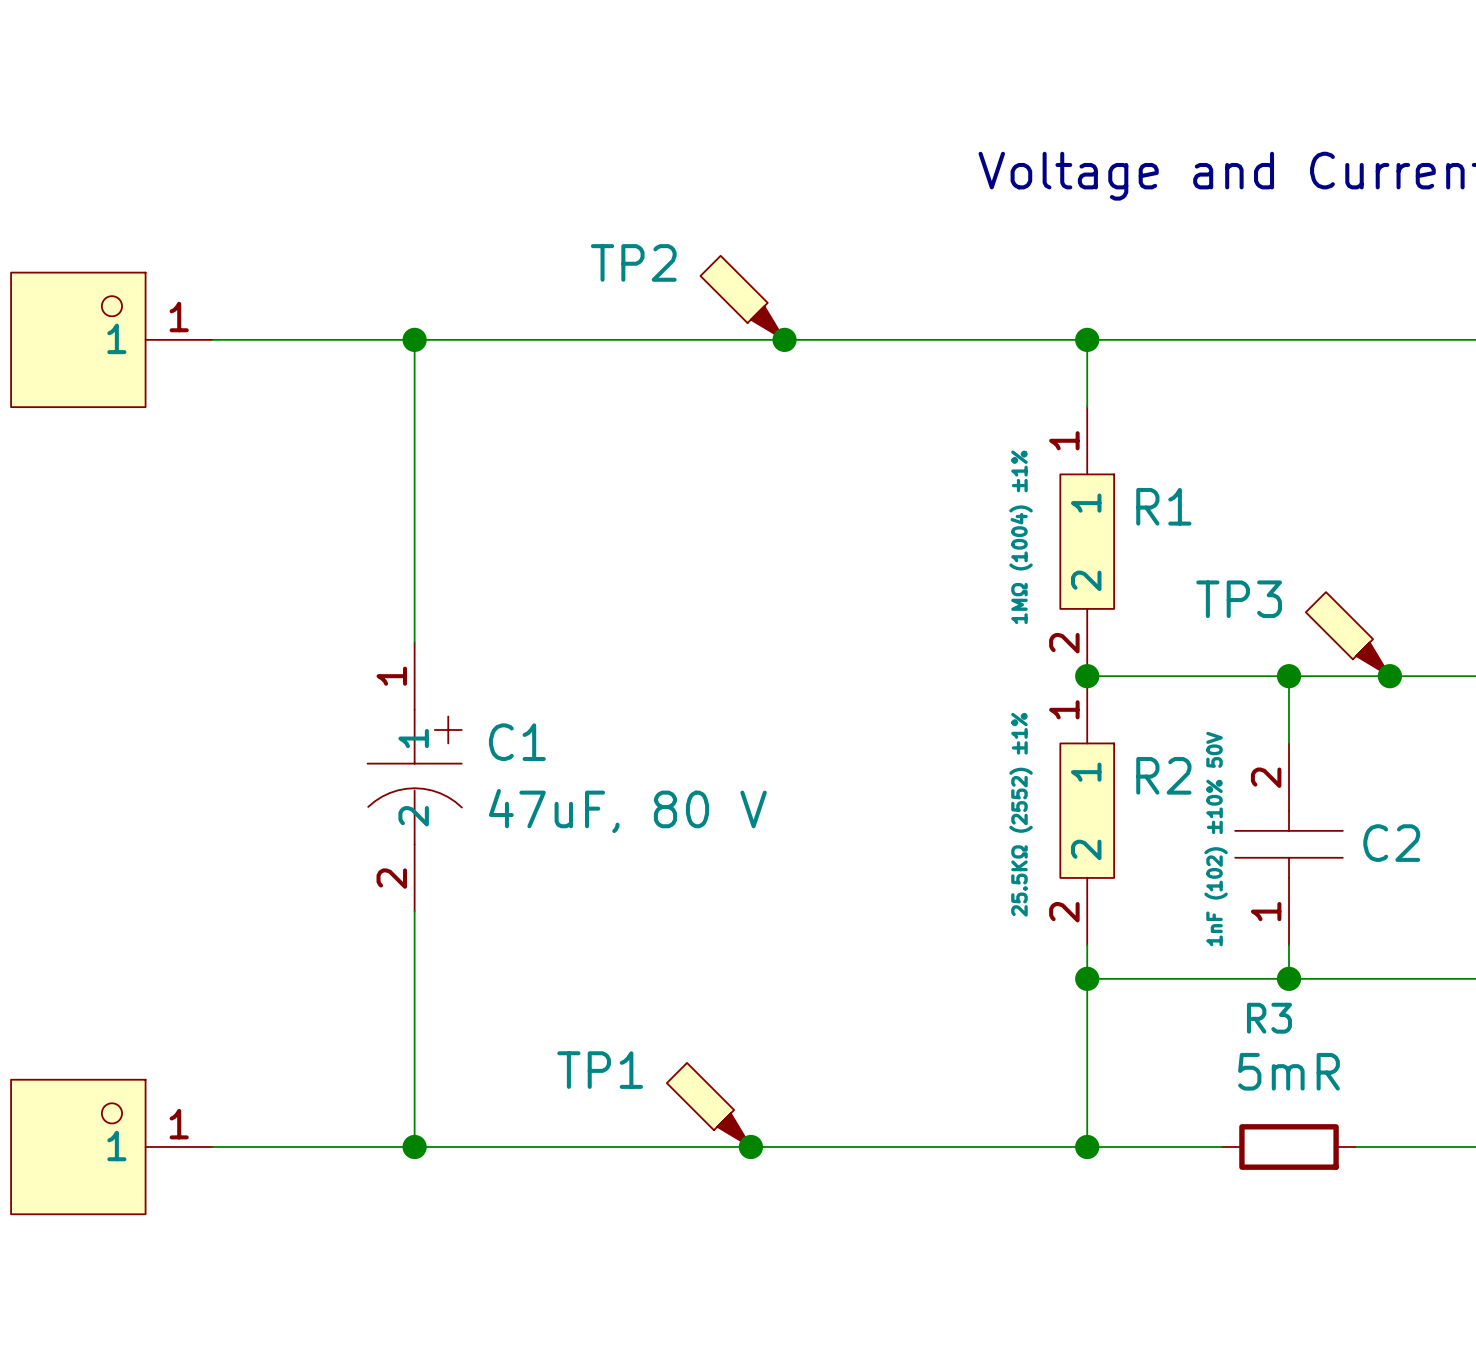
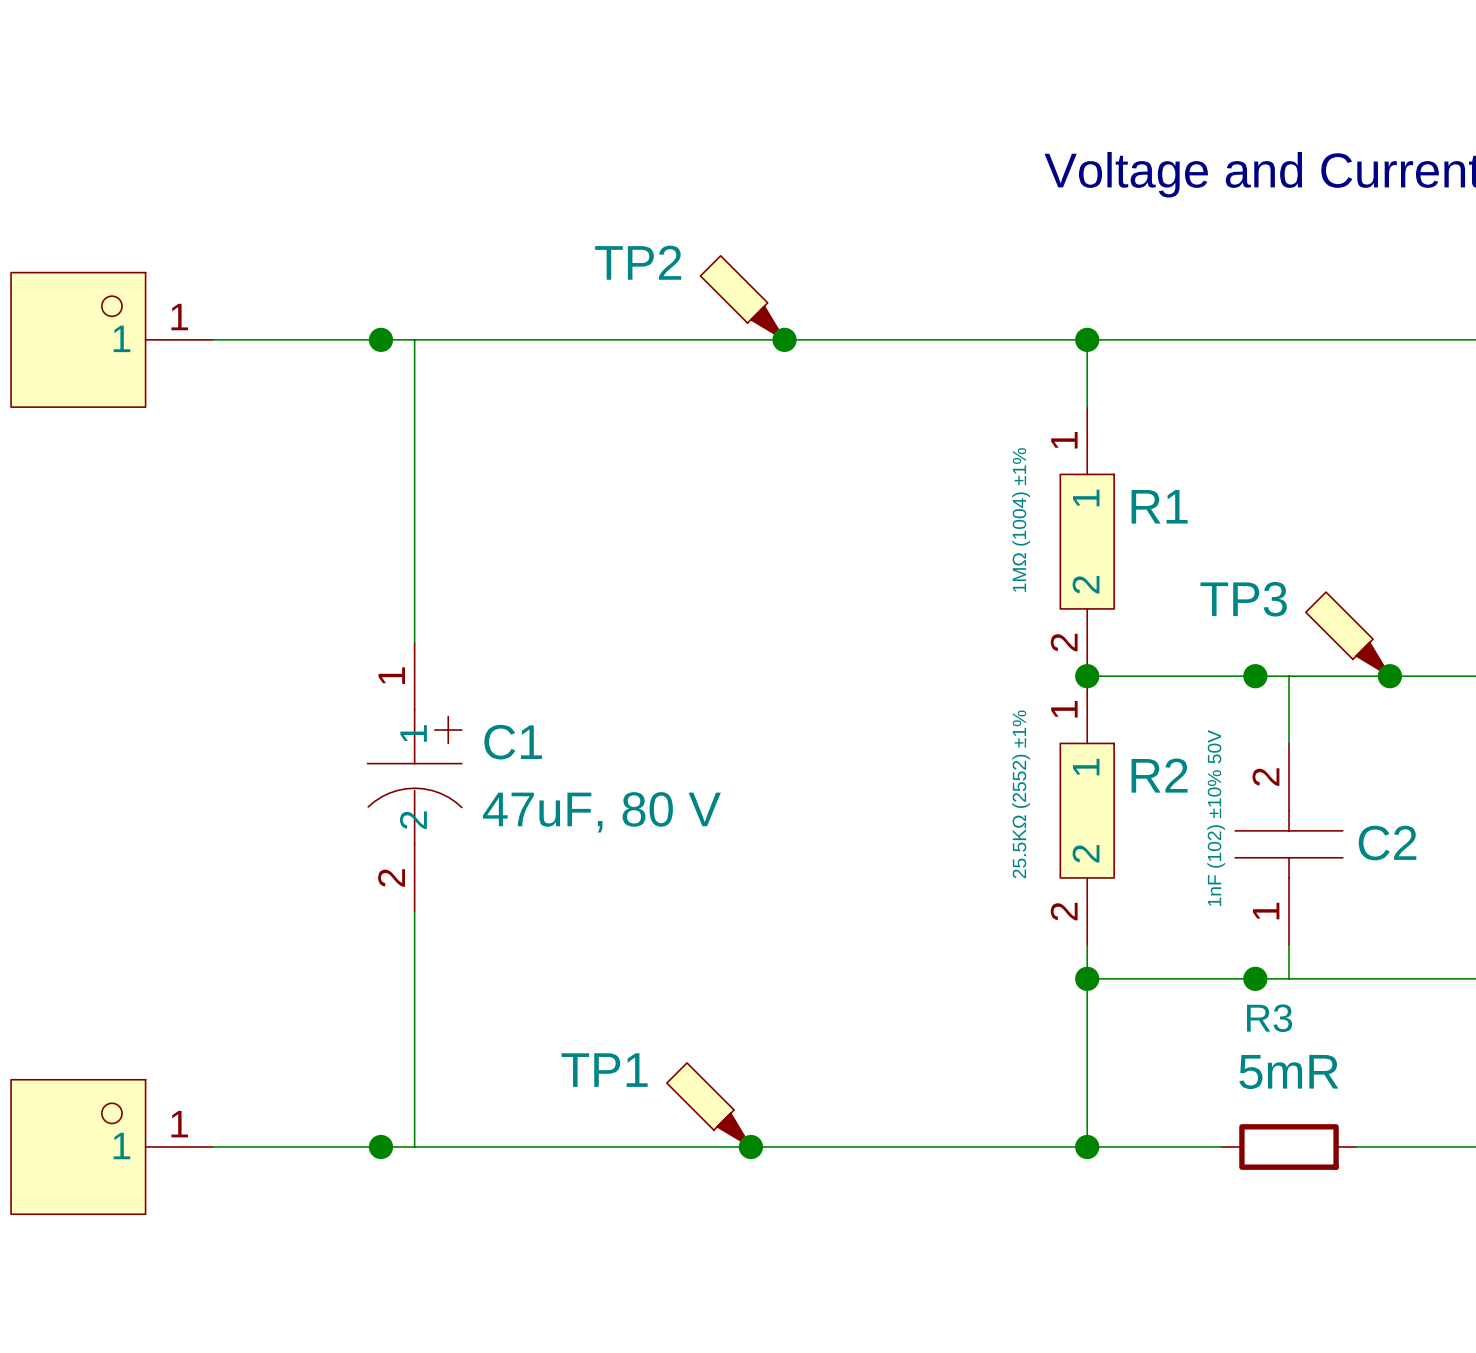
junction position: (414, 339) -> (380, 339)
junction position: (1289, 676) -> (1255, 676)
junction position: (1289, 978) -> (1255, 978)
junction position: (414, 1147) -> (380, 1147)

